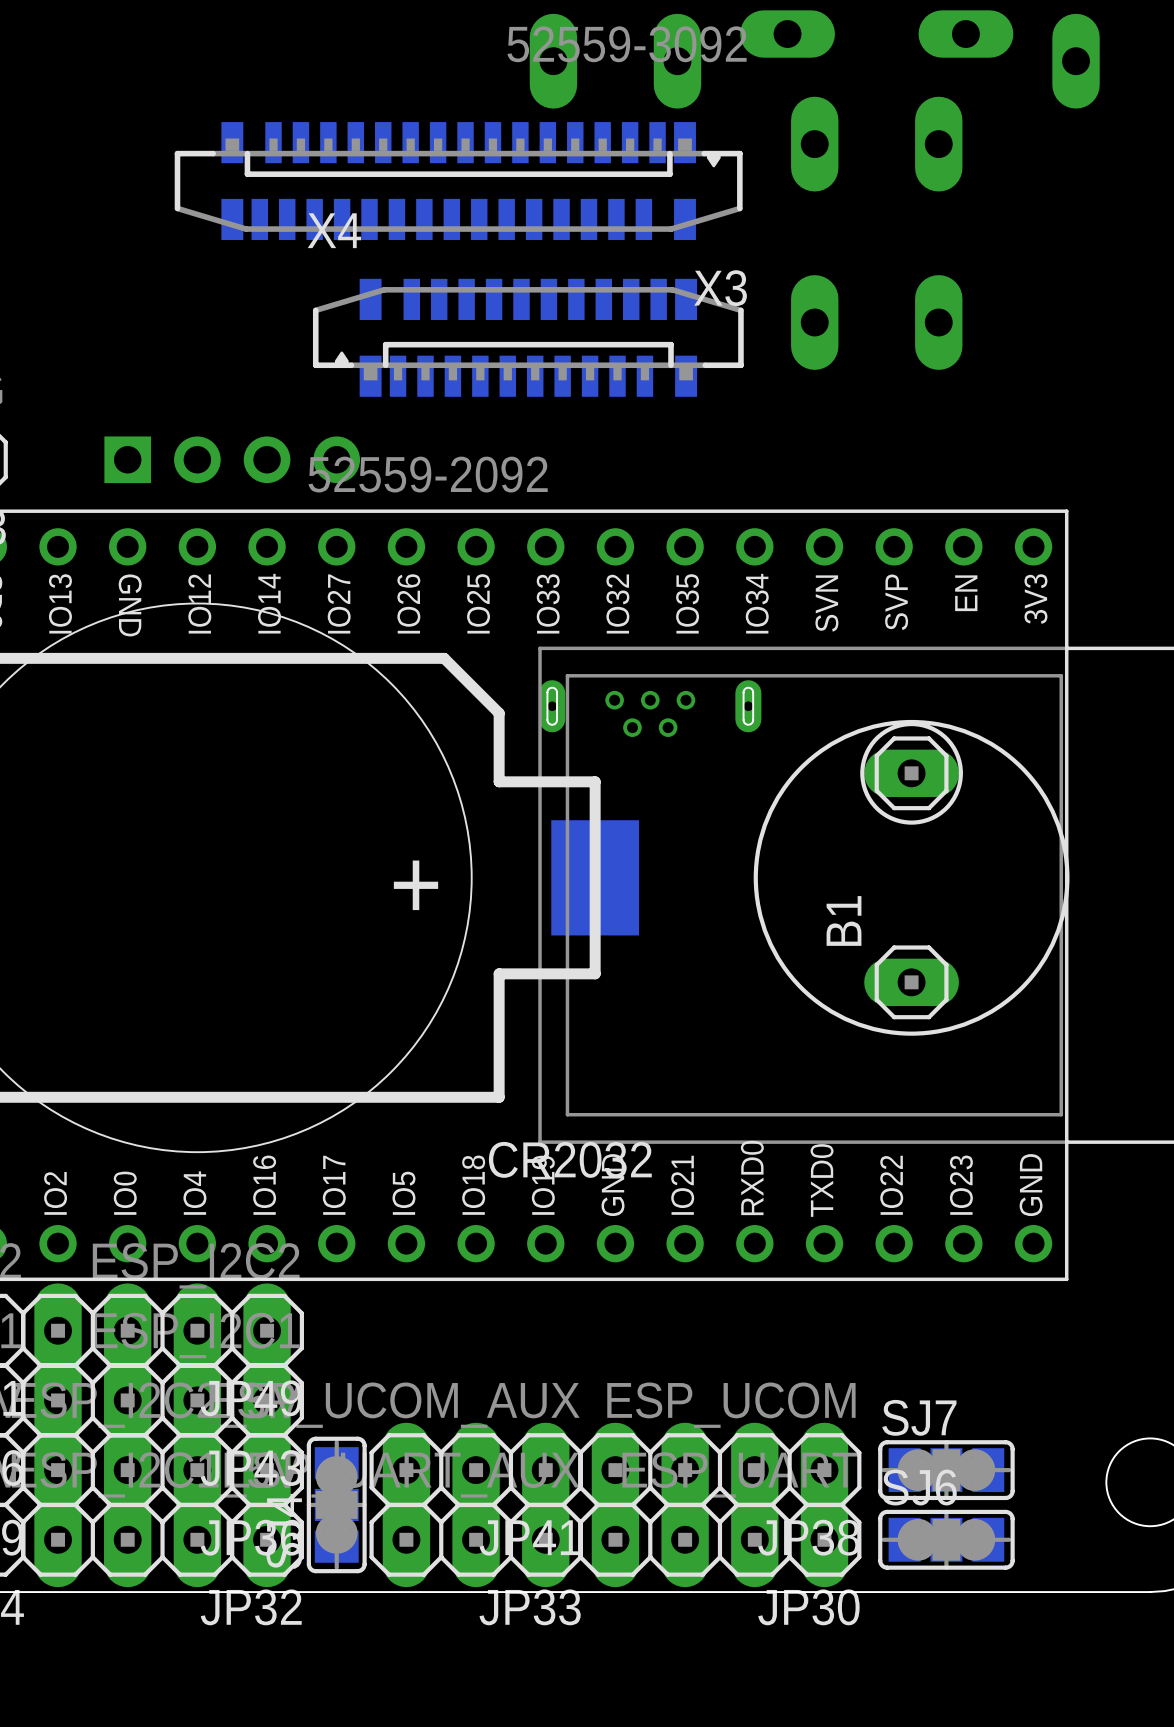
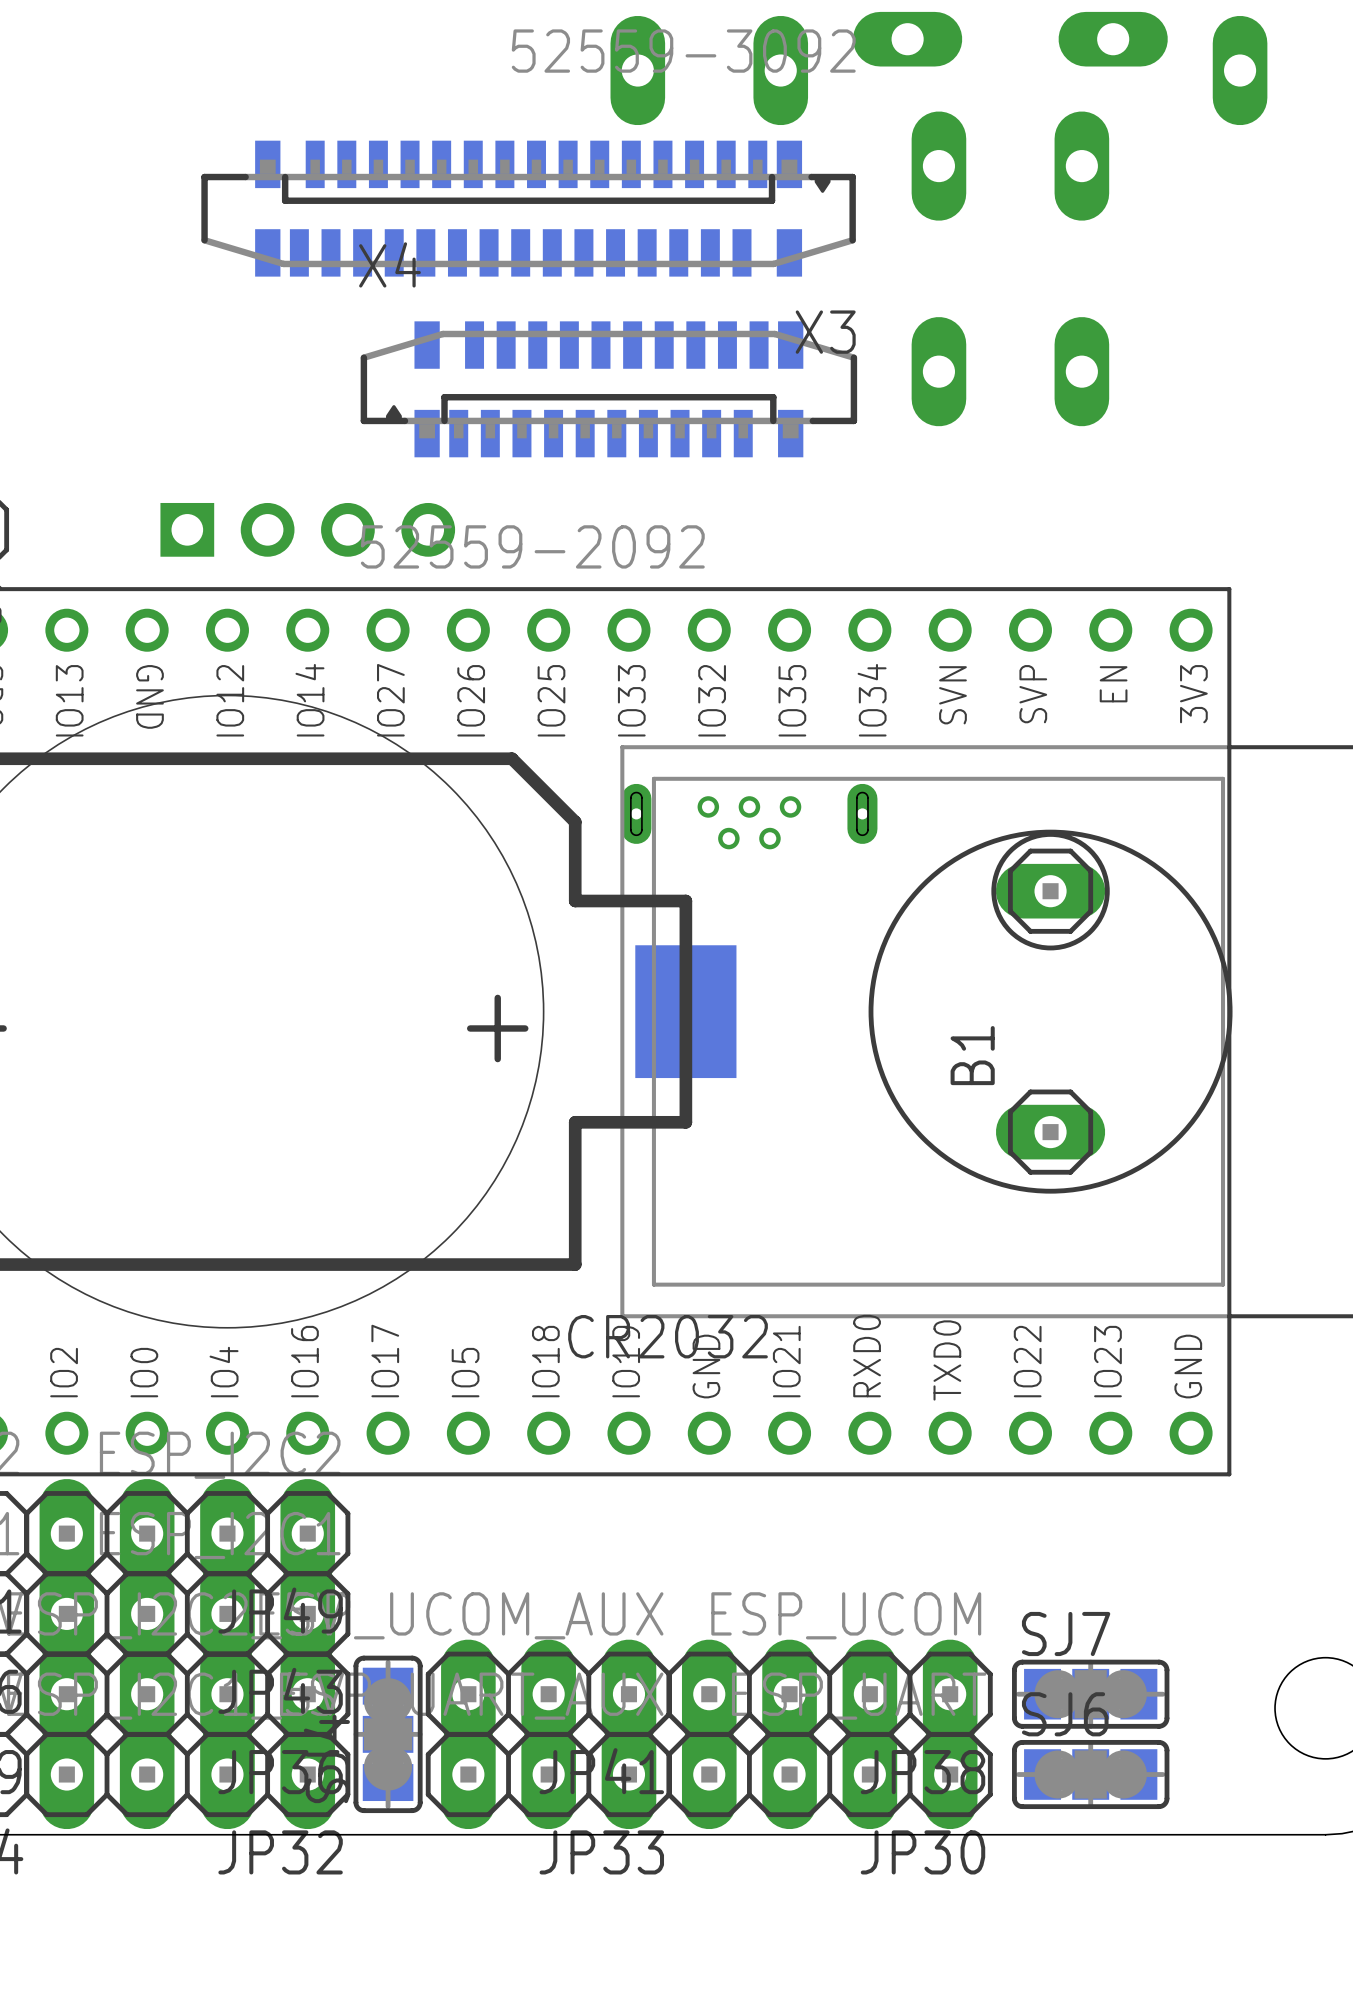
part position: (232, 459) -> (307, 529)

